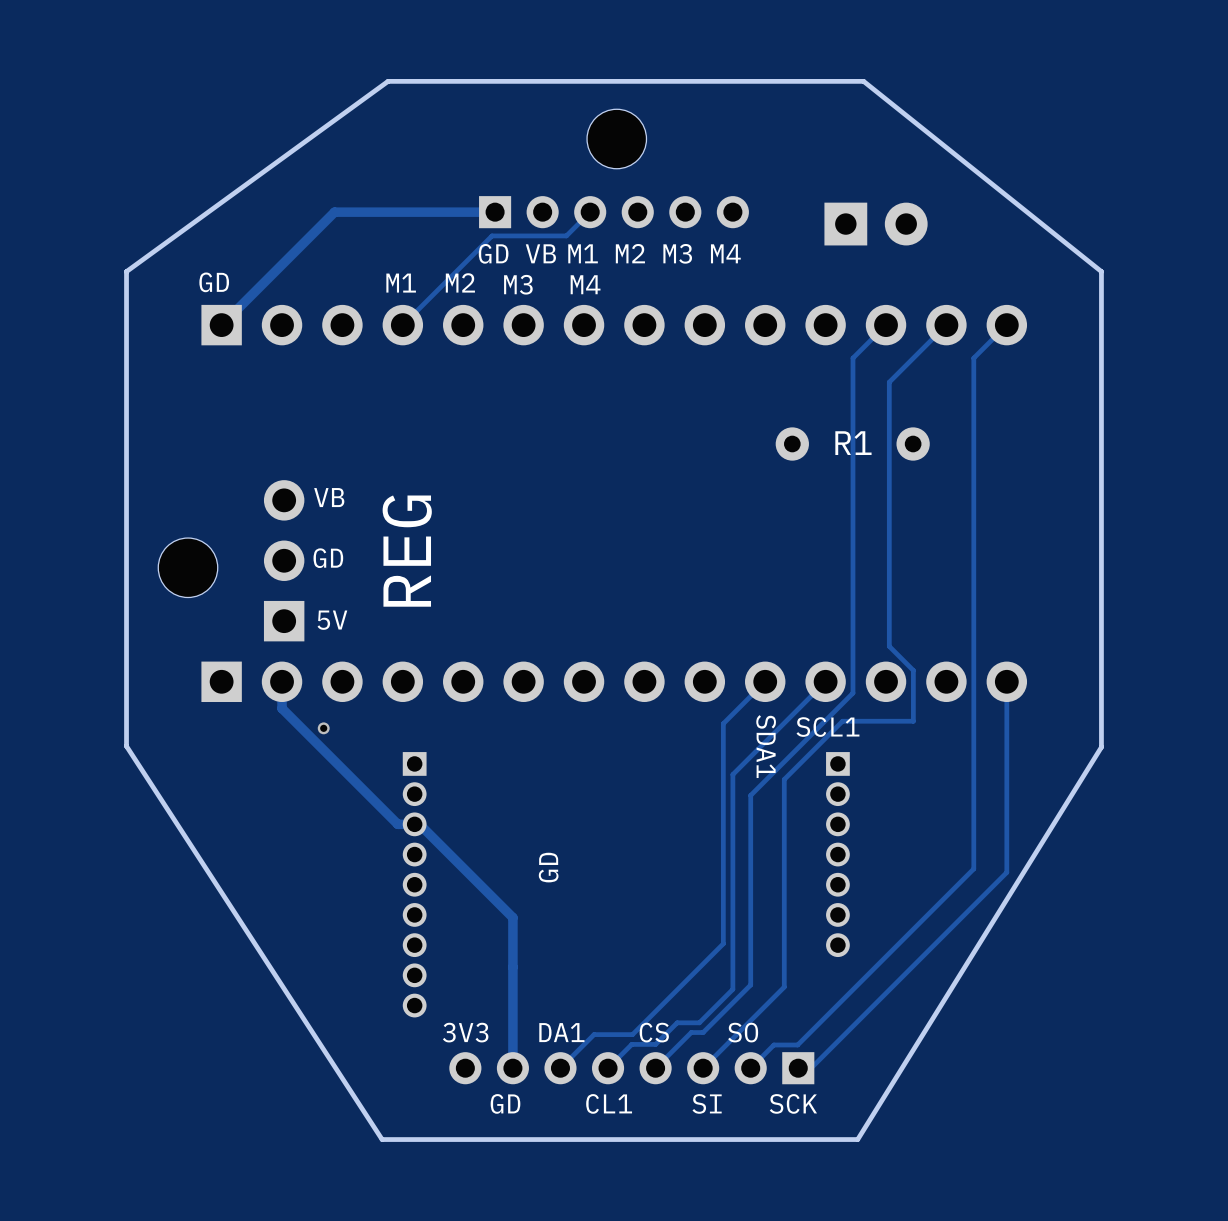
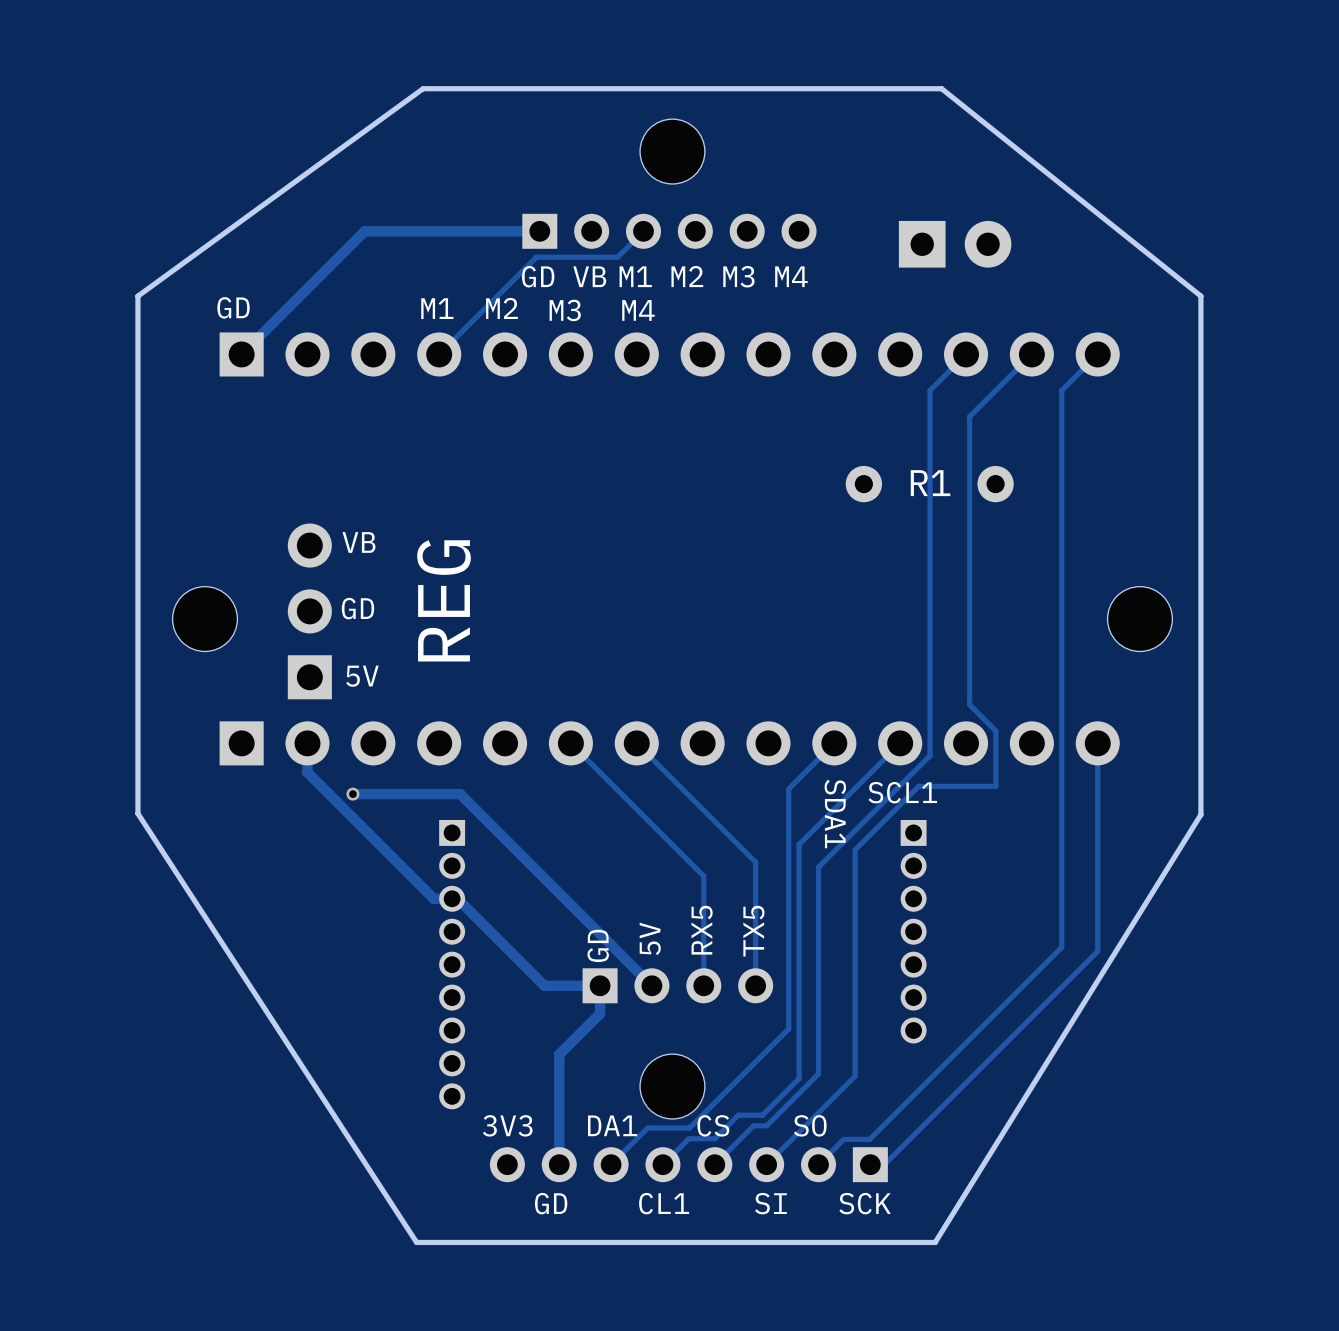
part: none -> (1139, 619)
track: none -> (570, 743) (703, 876) (703, 985)
track: none -> (636, 743) (755, 862) (755, 985)
track: none -> (352, 794) (460, 794) (651, 985)
text: none -> RX5 (702, 930)
text: none -> TX5 (753, 931)
text: none -> 5V (650, 938)
track: (499, 904) (512, 917) (512, 967) -> (544, 985) (600, 985) (600, 1013) (559, 1054)
part: none -> (677, 985)
part: none -> (672, 1086)

